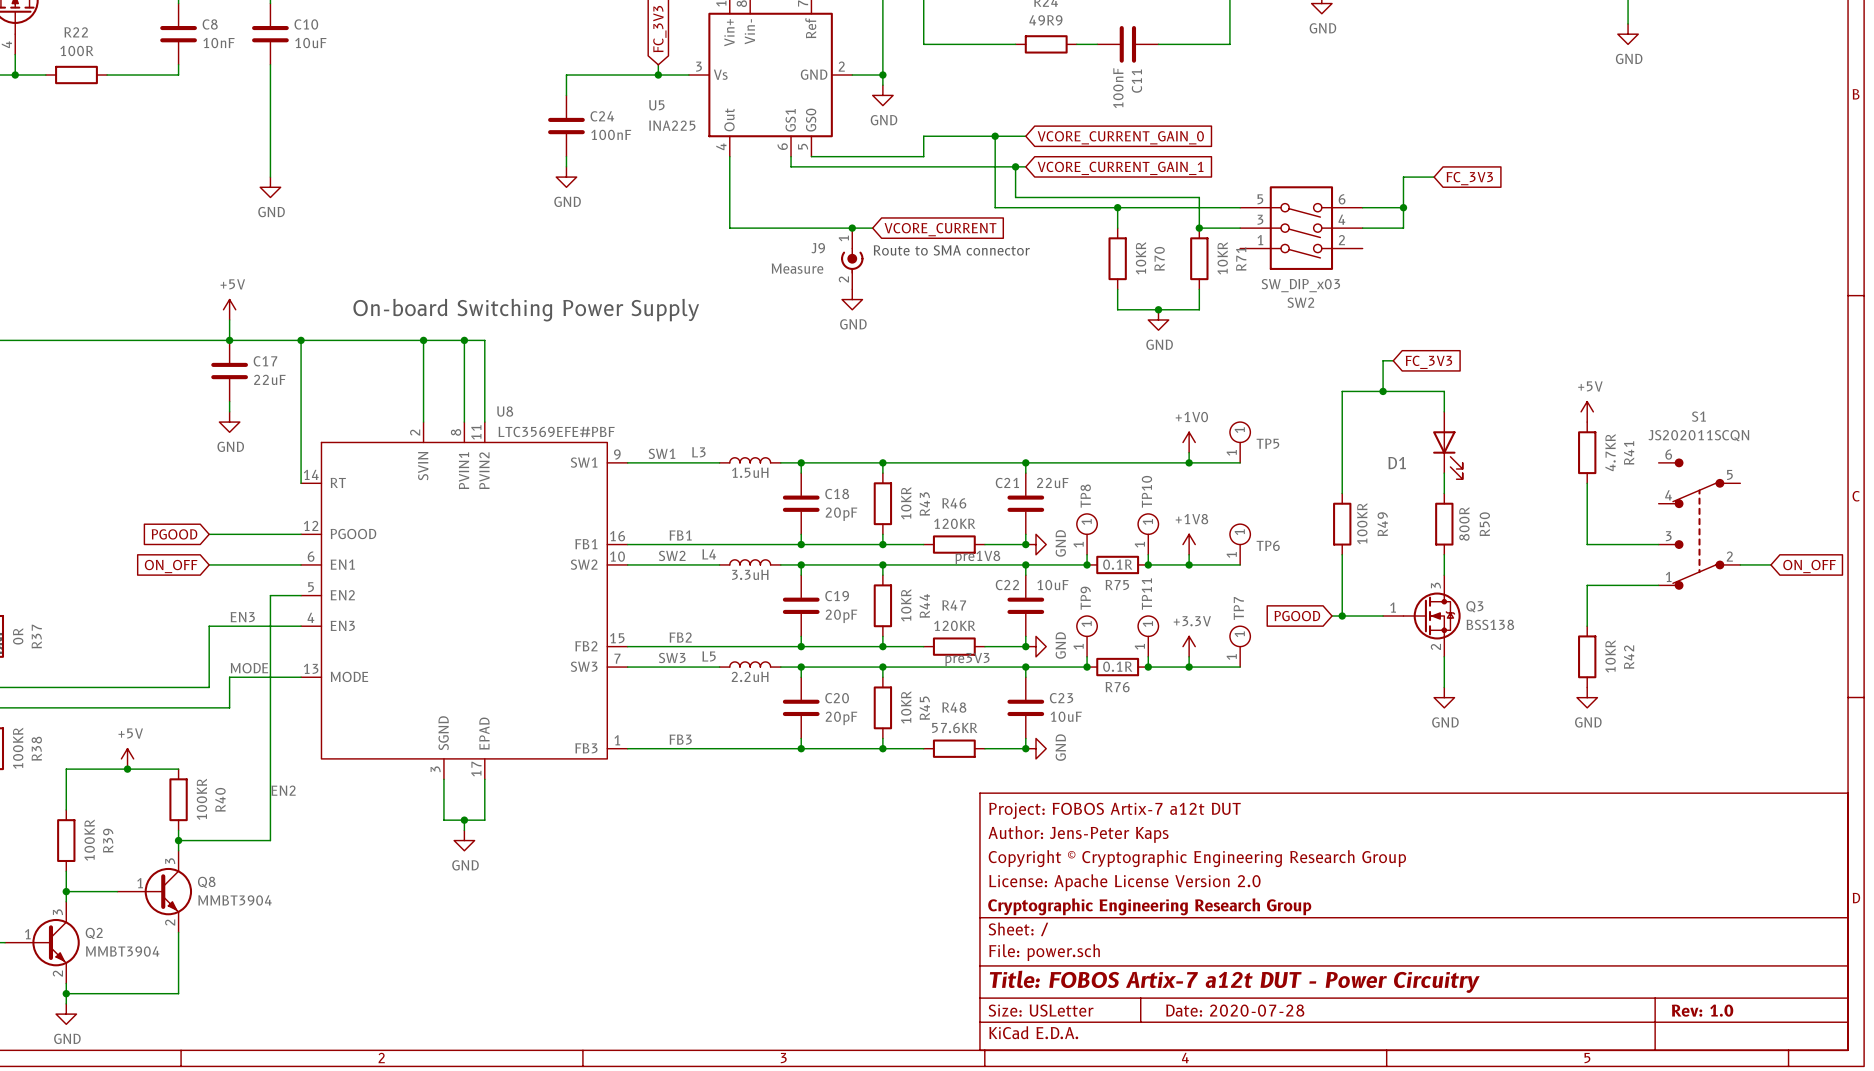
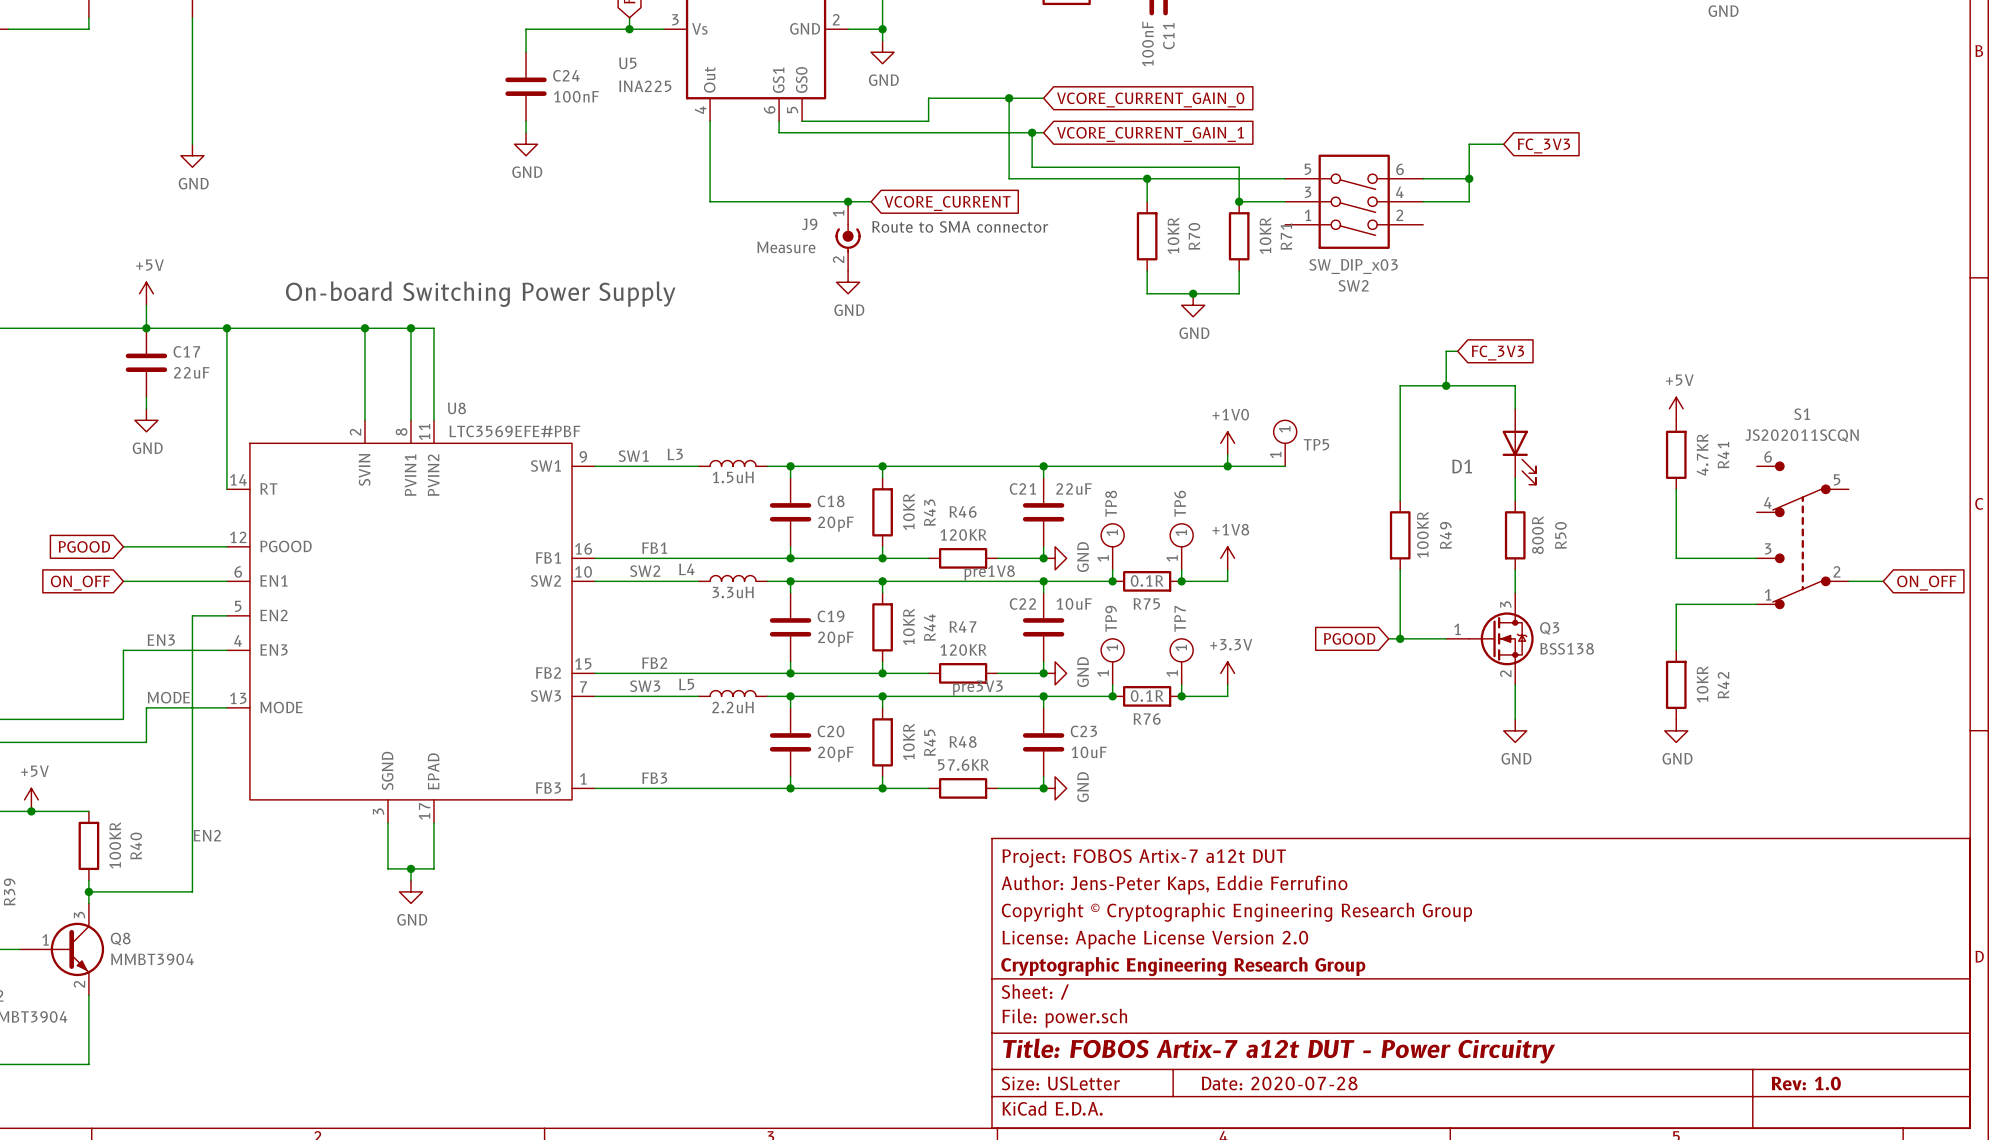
TP10 name: TP10 (1146, 491) -> TP6 (1180, 503)
TP6: (1240, 544) -> none
wire: (1189, 564) (1240, 564) -> none
junction: (1189, 564) -> none
TP11 name: TP11 (1146, 594) -> TP7 (1180, 618)
TP7: (1240, 646) -> none
wire: (1189, 667) (1240, 667) -> none
junction: (1189, 667) -> none
title block: Author: Jens-Peter Kaps (1078, 834) -> Author: Jens-Peter Kaps, Eddie Ferrufino (1174, 885)

